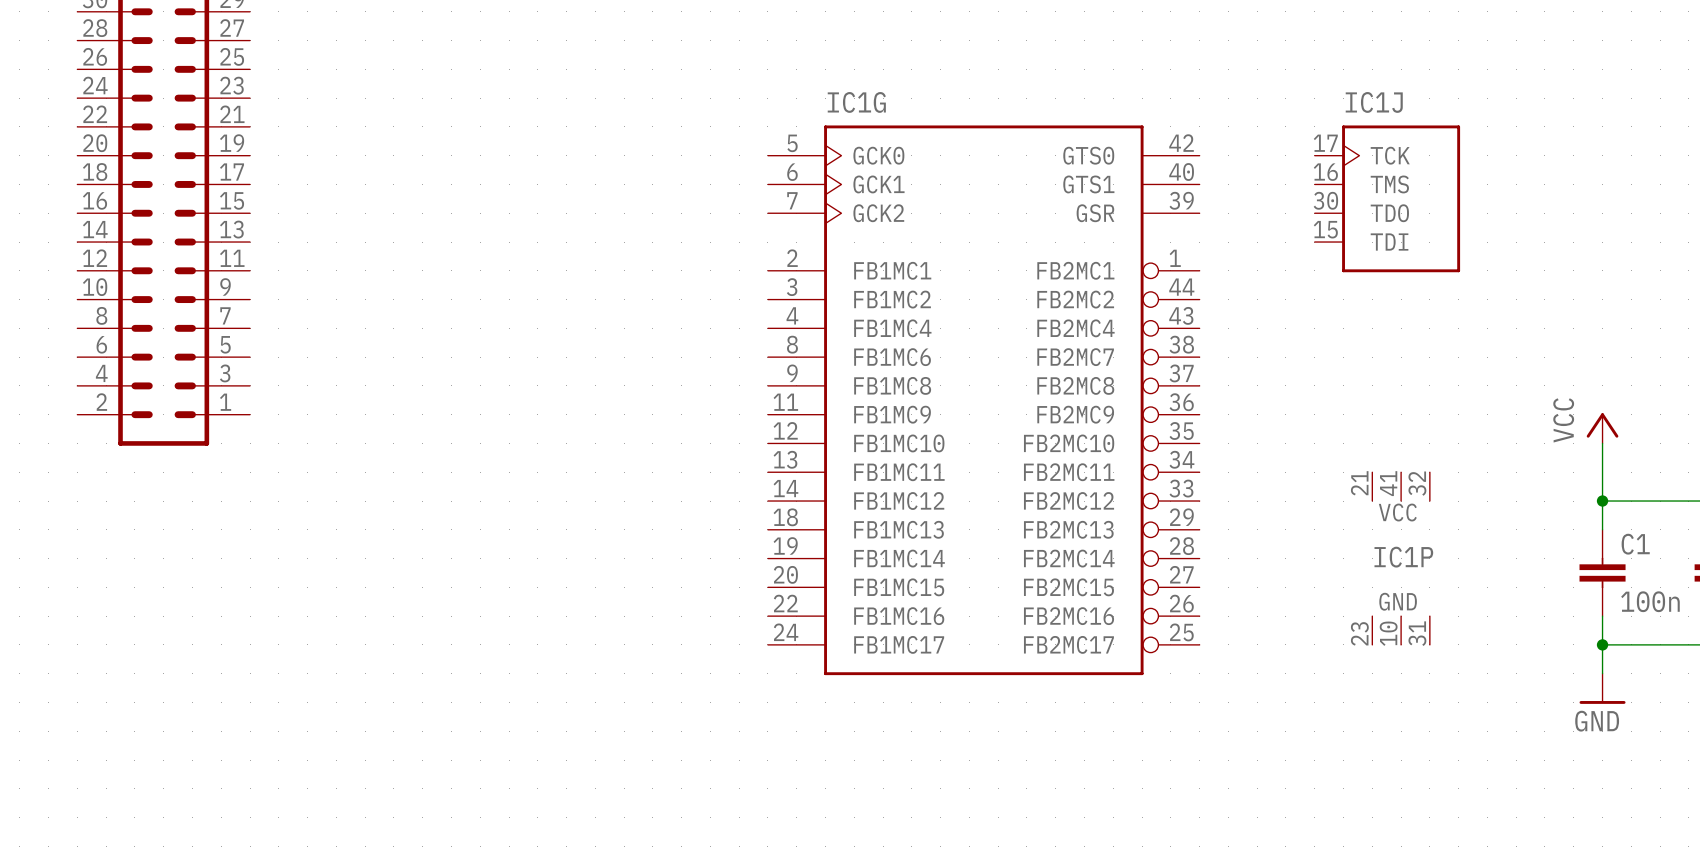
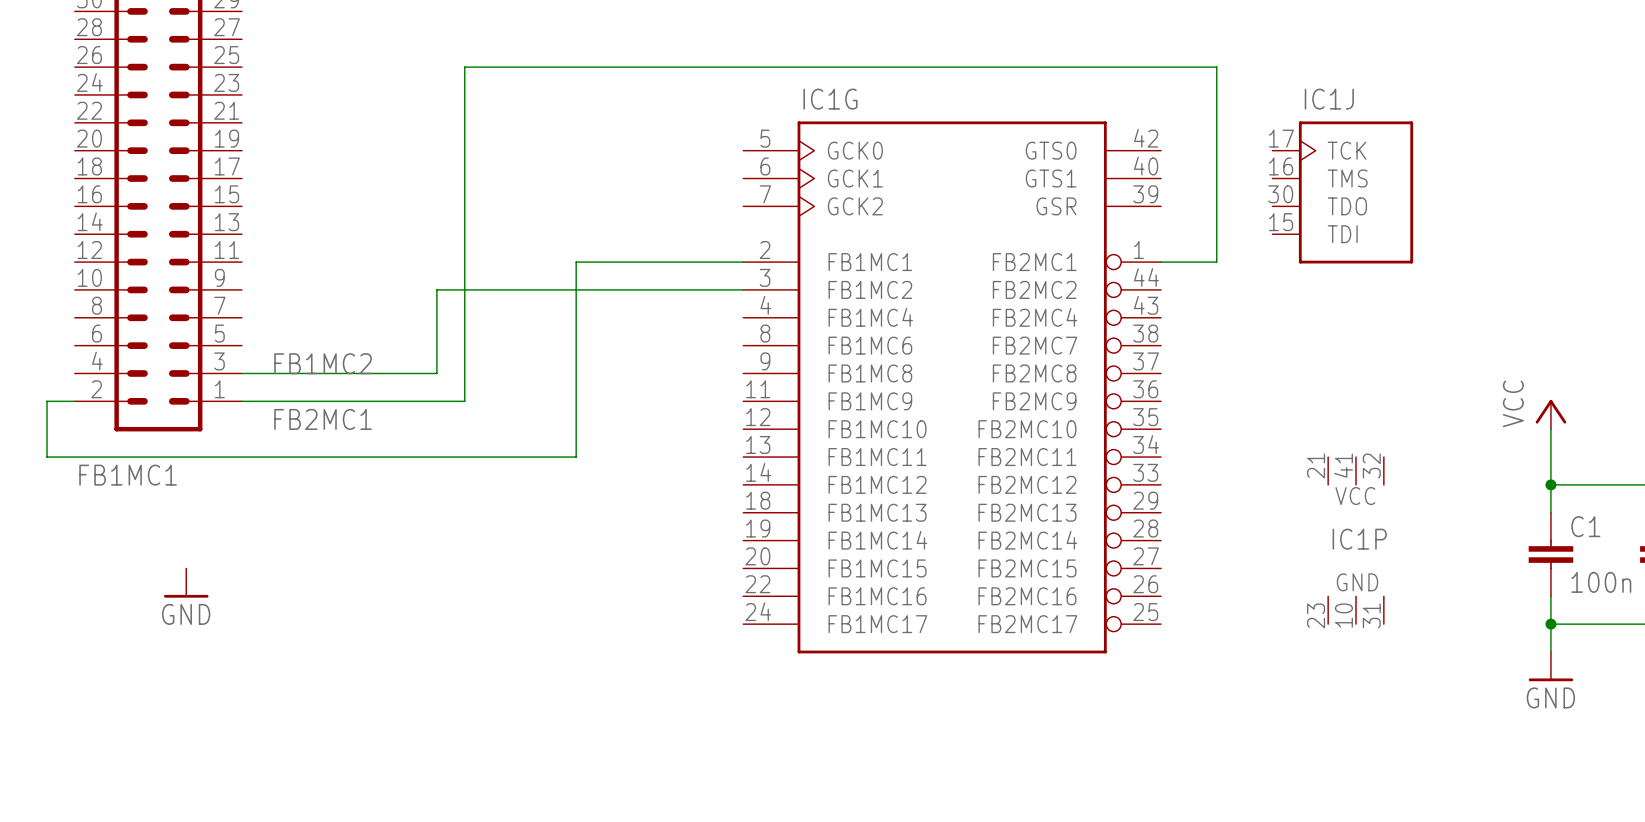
wire: none -> (743, 262) (576, 262) (576, 457) (47, 457) (47, 401) (74, 401)
wire: none -> (1161, 262) (1216, 262) (1216, 67) (464, 67) (464, 401) (241, 401)
wire: none -> (743, 289) (436, 289) (436, 373) (241, 373)
label: none -> FB1MC2 (323, 363)
label: none -> FB2MC1 (323, 419)
label: none -> FB1MC1 (128, 475)
power symbol: none -> GND (186, 583)

